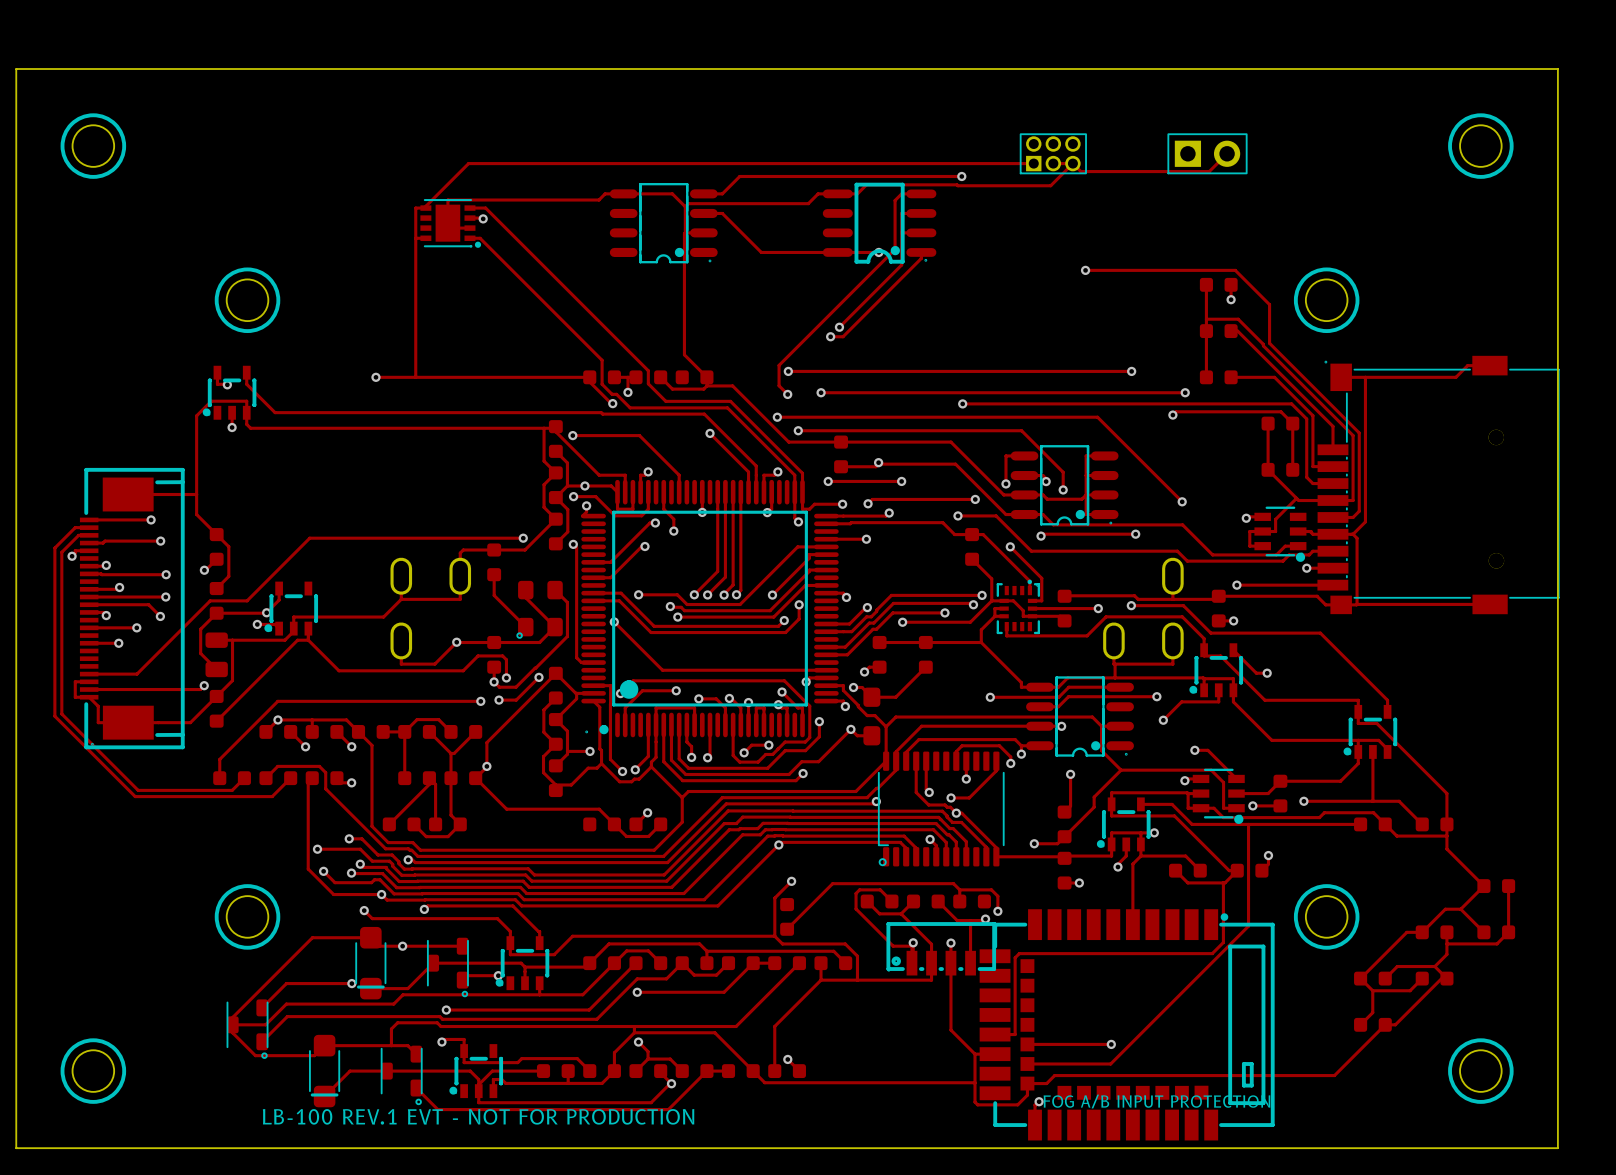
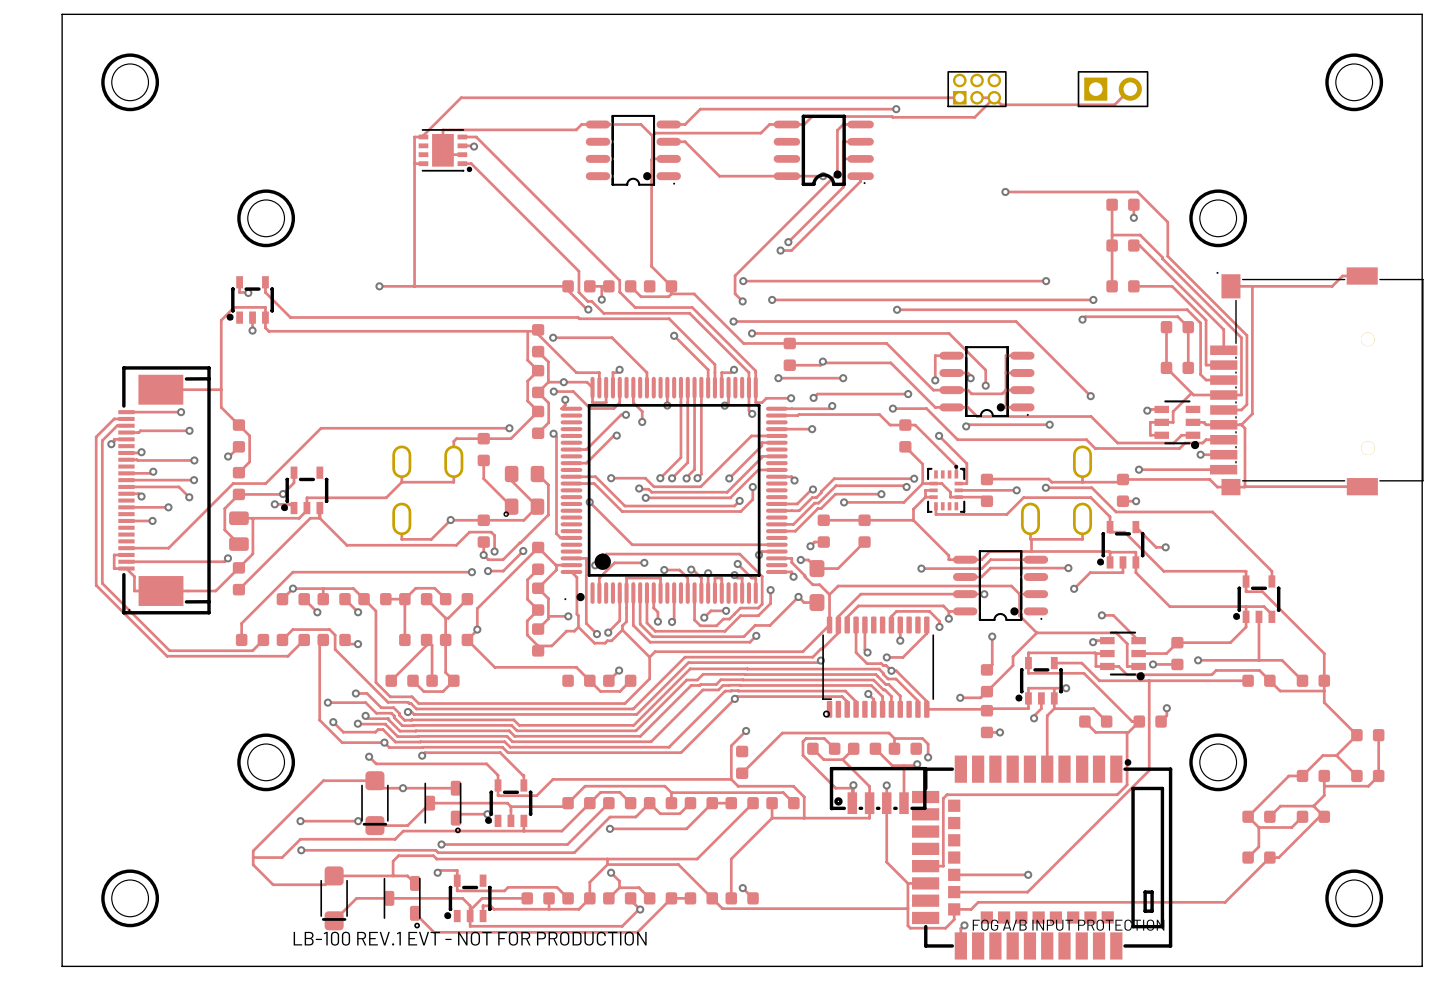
track: (286, 983) (262, 1007) -> none
via: none -> (300, 821)
track: (287, 1016) (262, 1041) -> none
via: none -> (301, 850)
part: (247, 1029) -> none

